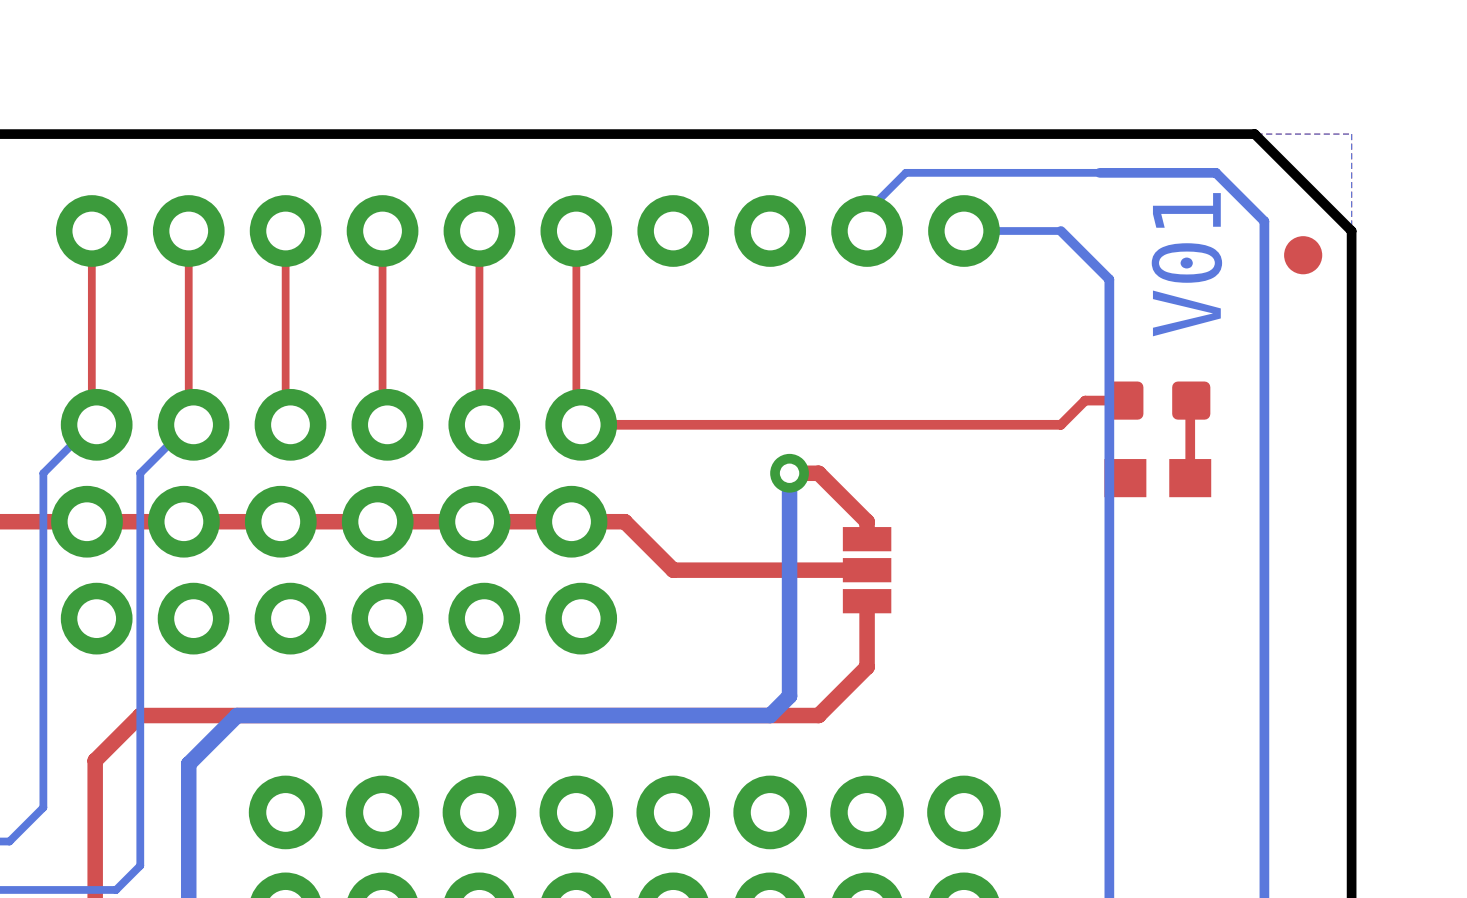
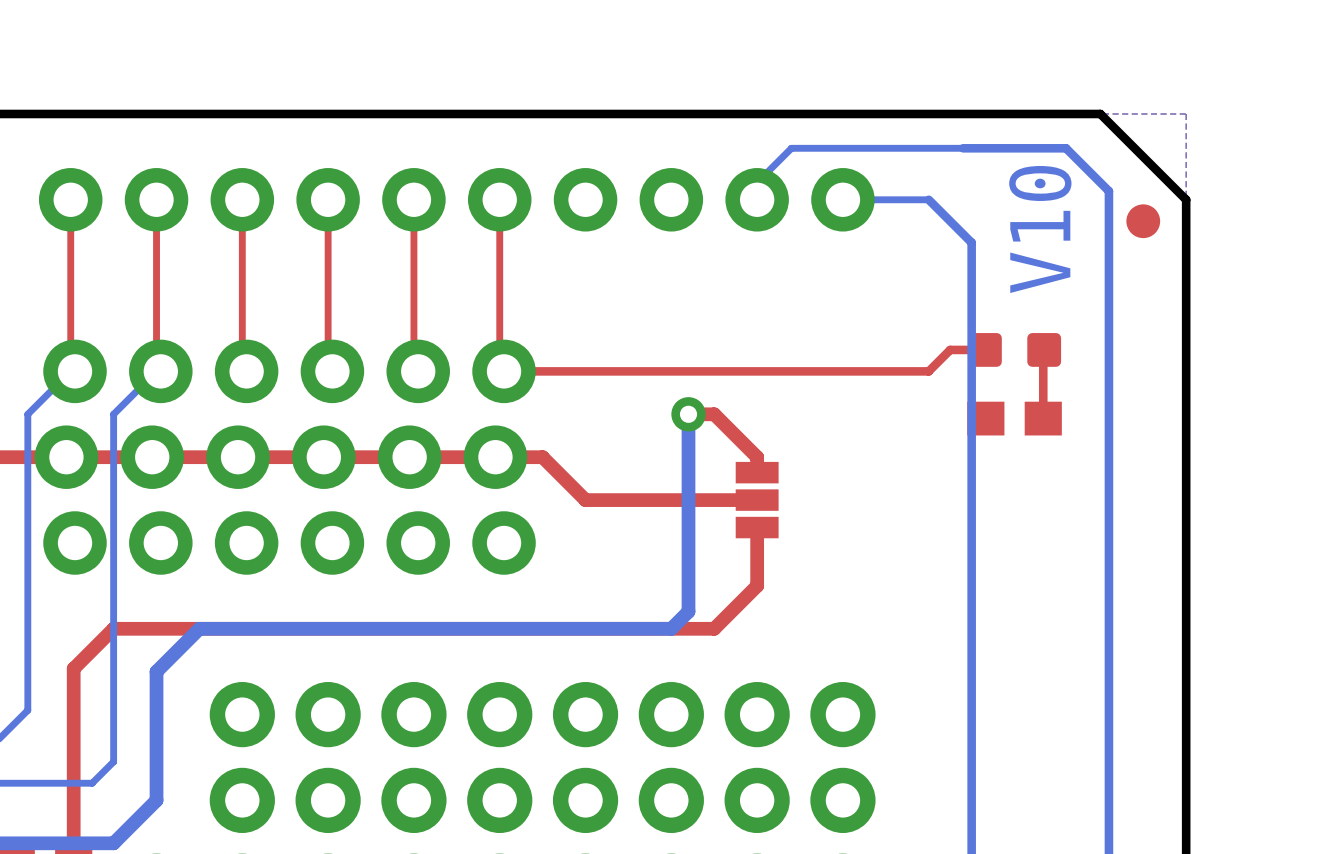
text: V01 (1186, 264) -> V10 (1040, 229)

